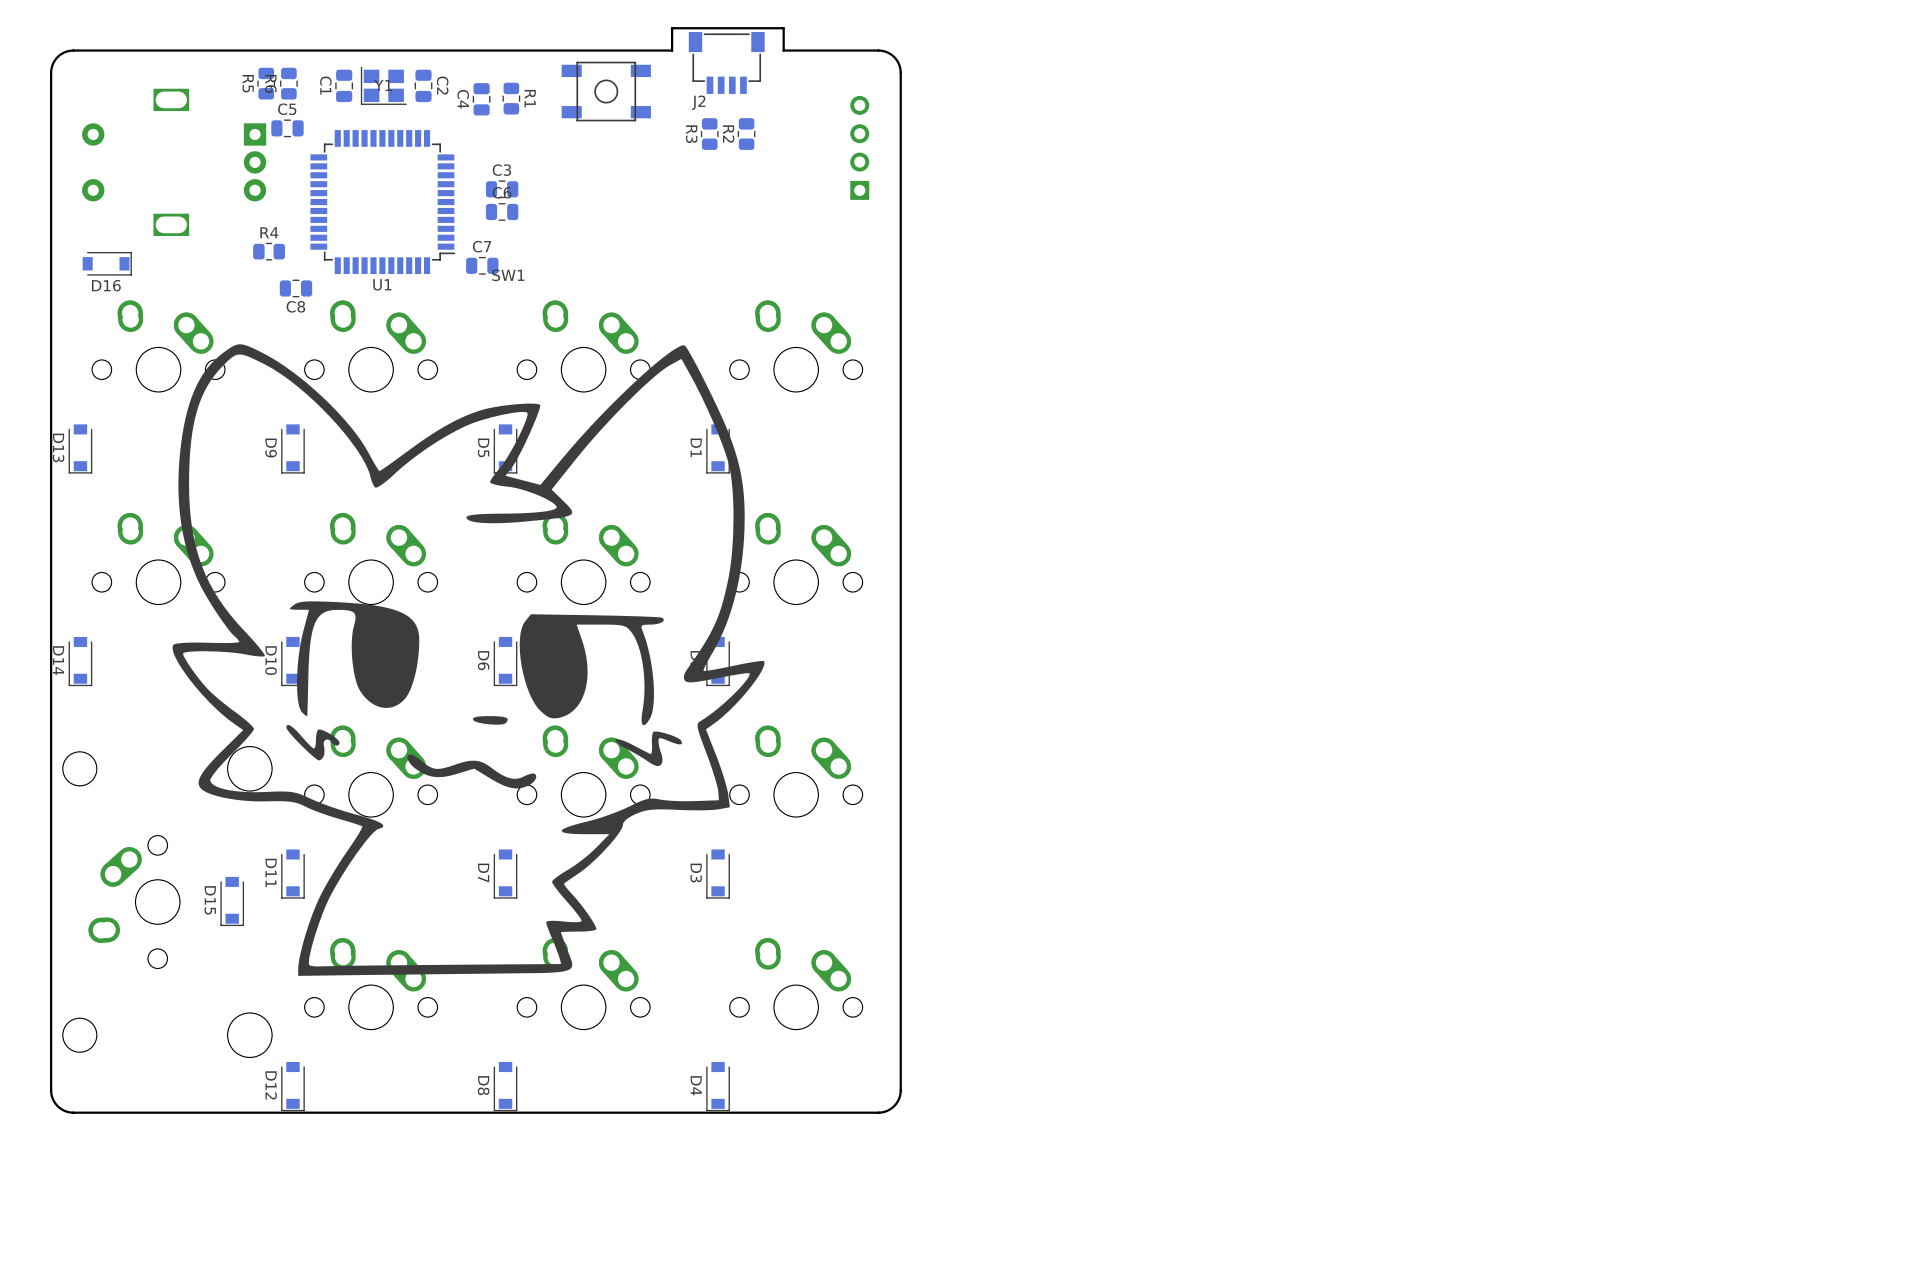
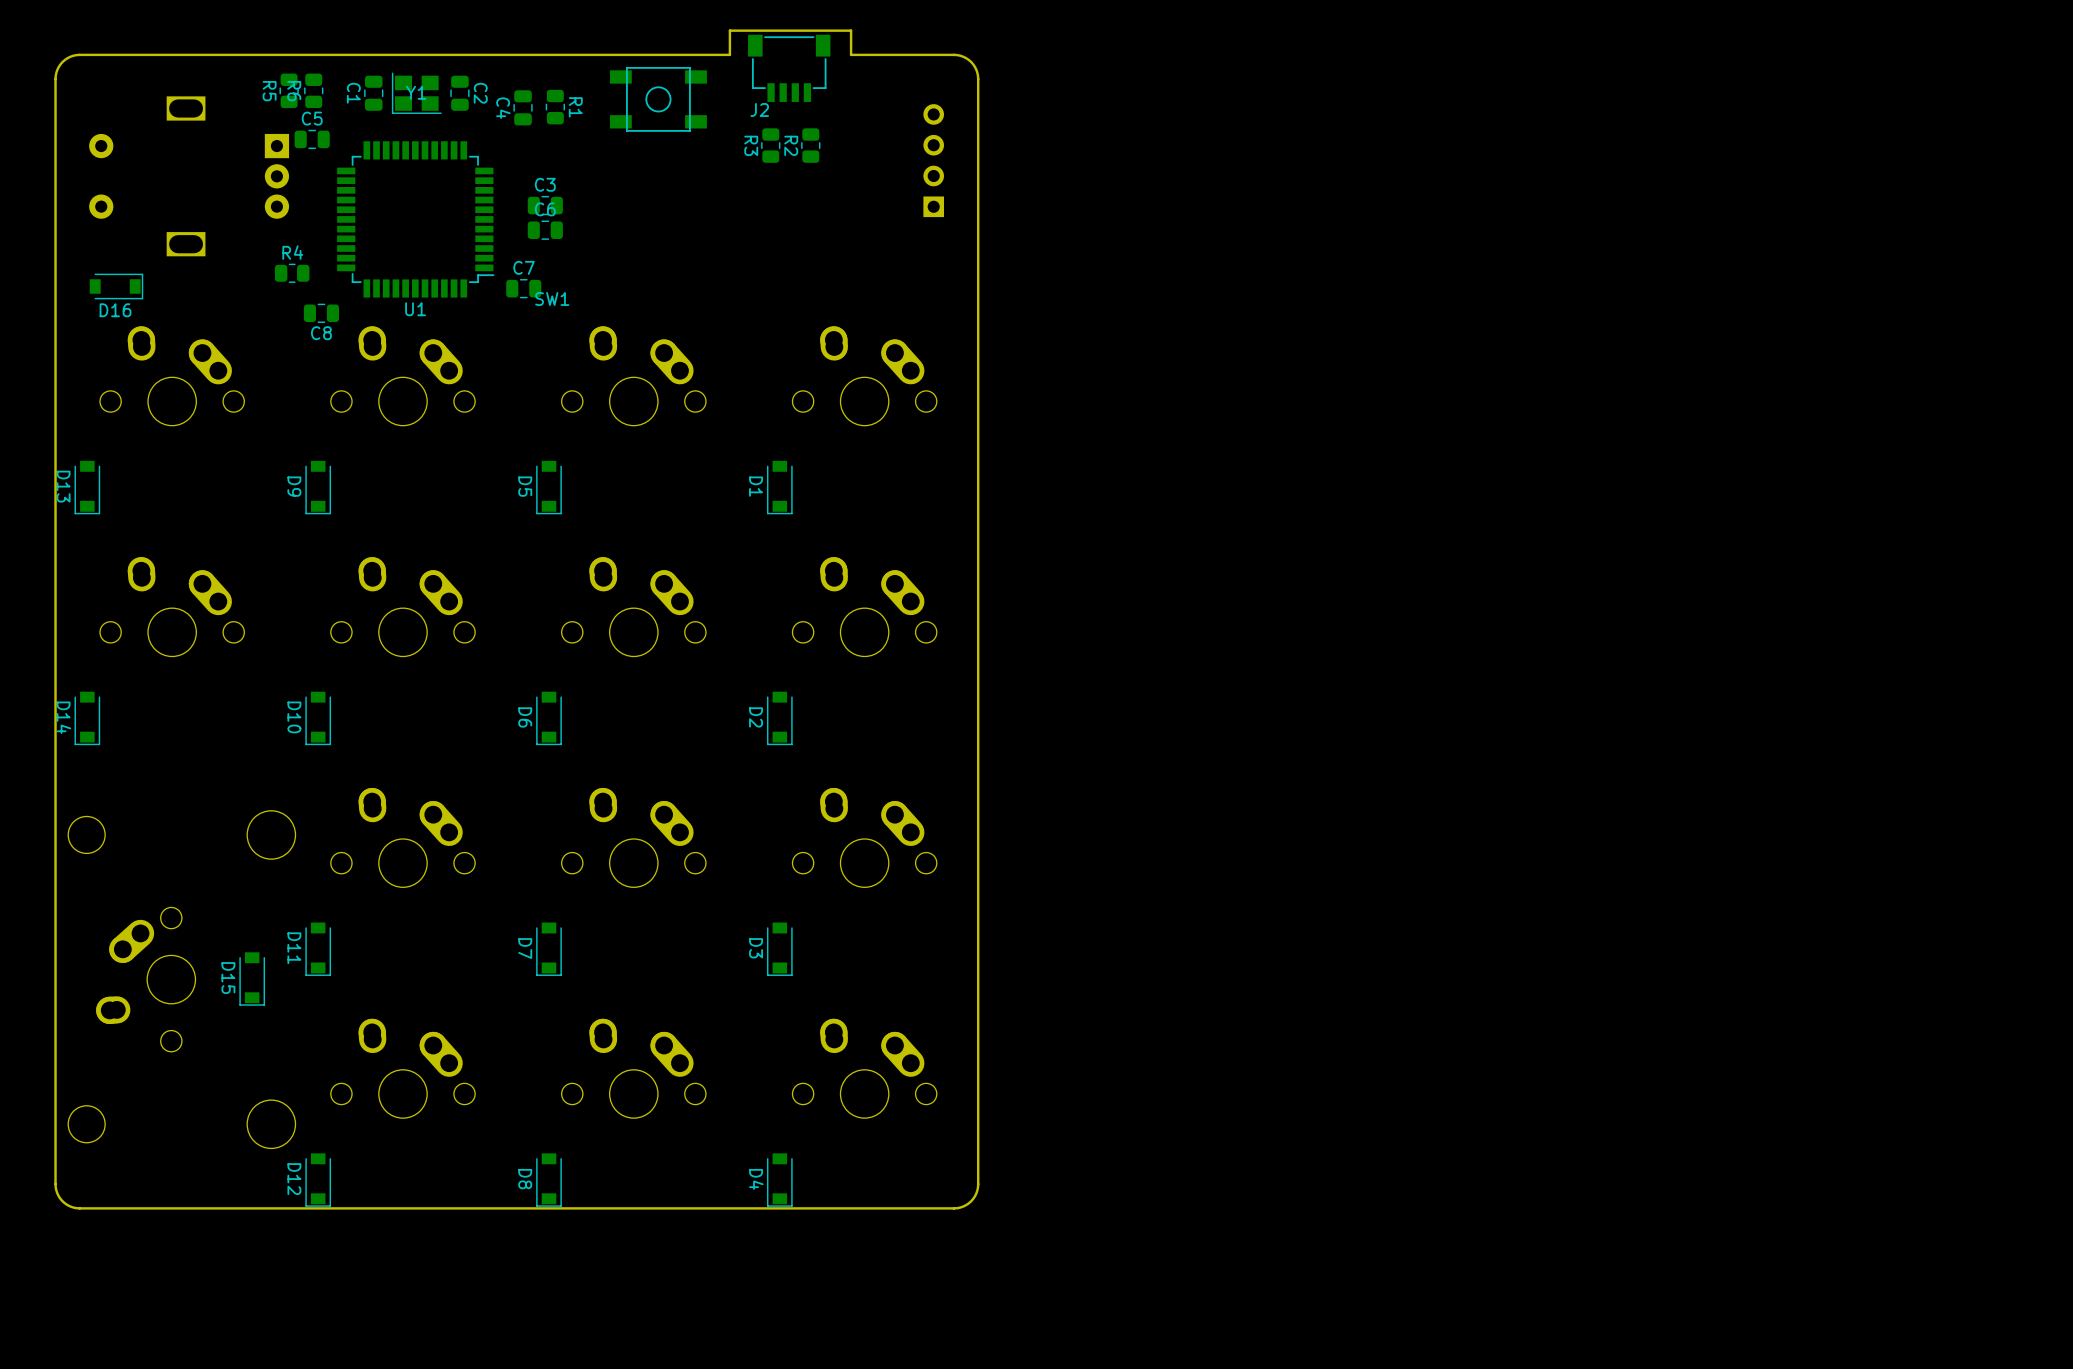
drawing: [172, 344, 765, 976] -> none

